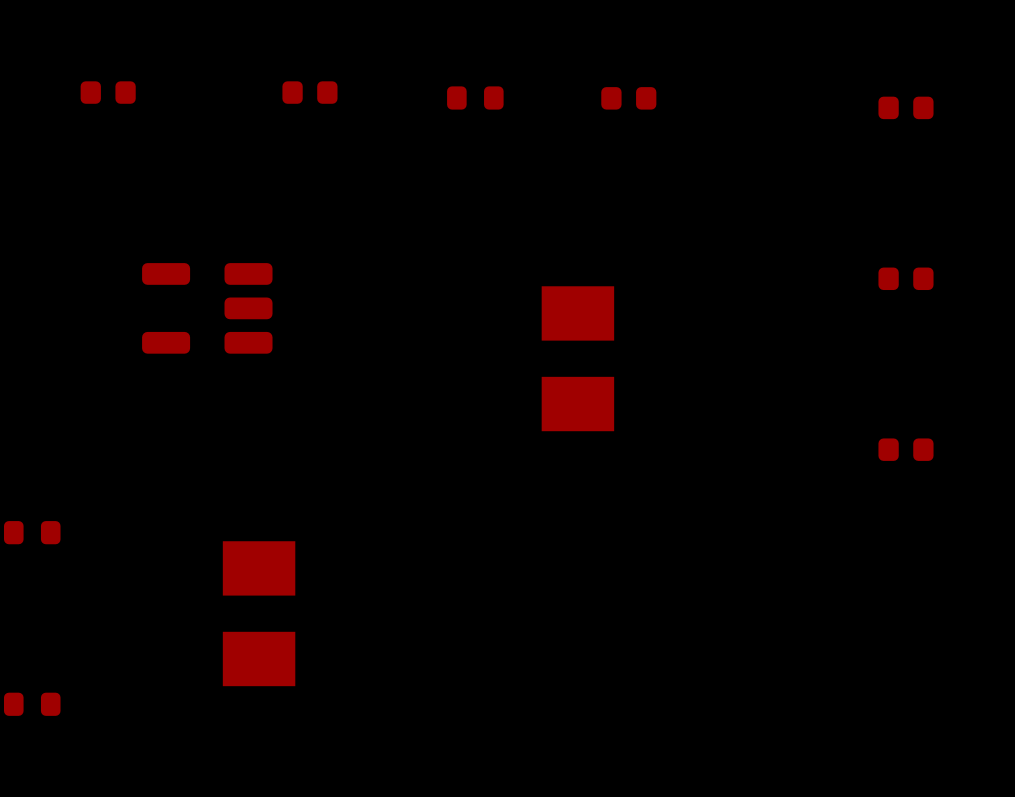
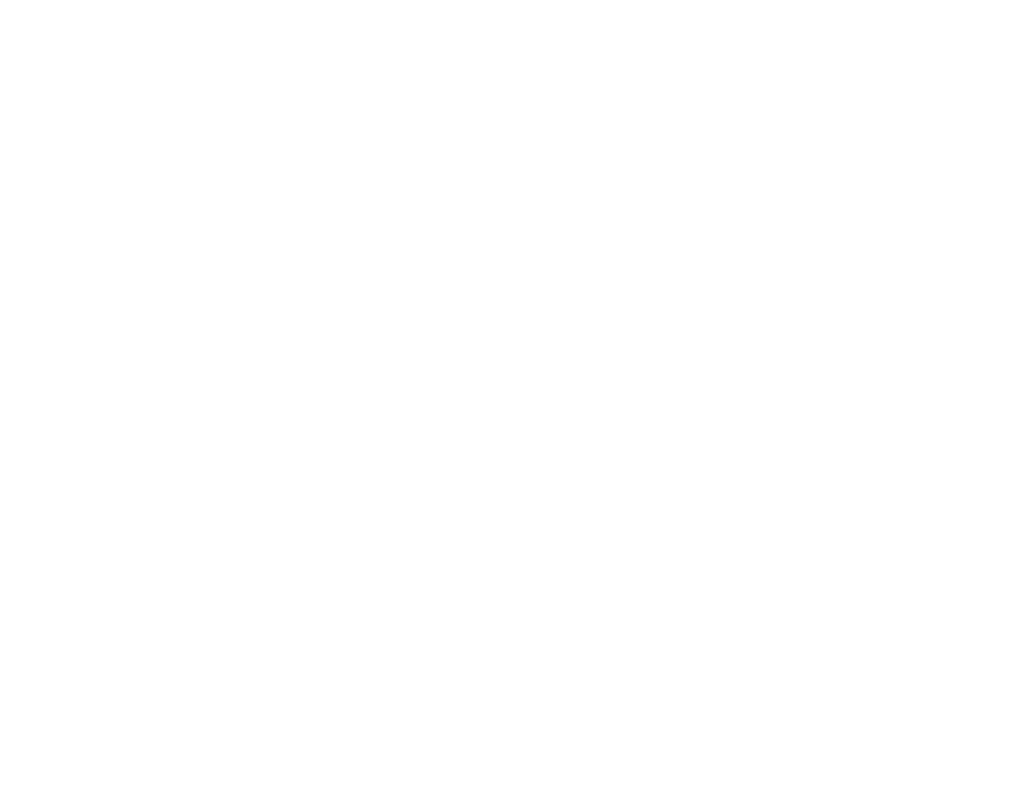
part: (108, 92) -> none
part: (309, 92) -> none
part: (475, 97) -> none
part: (628, 98) -> none
part: (905, 107) -> none
part: (905, 278) -> none
part: (207, 308) -> none
part: (577, 358) -> none
part: (905, 449) -> none
part: (32, 532) -> none
part: (259, 613) -> none
part: (32, 704) -> none

